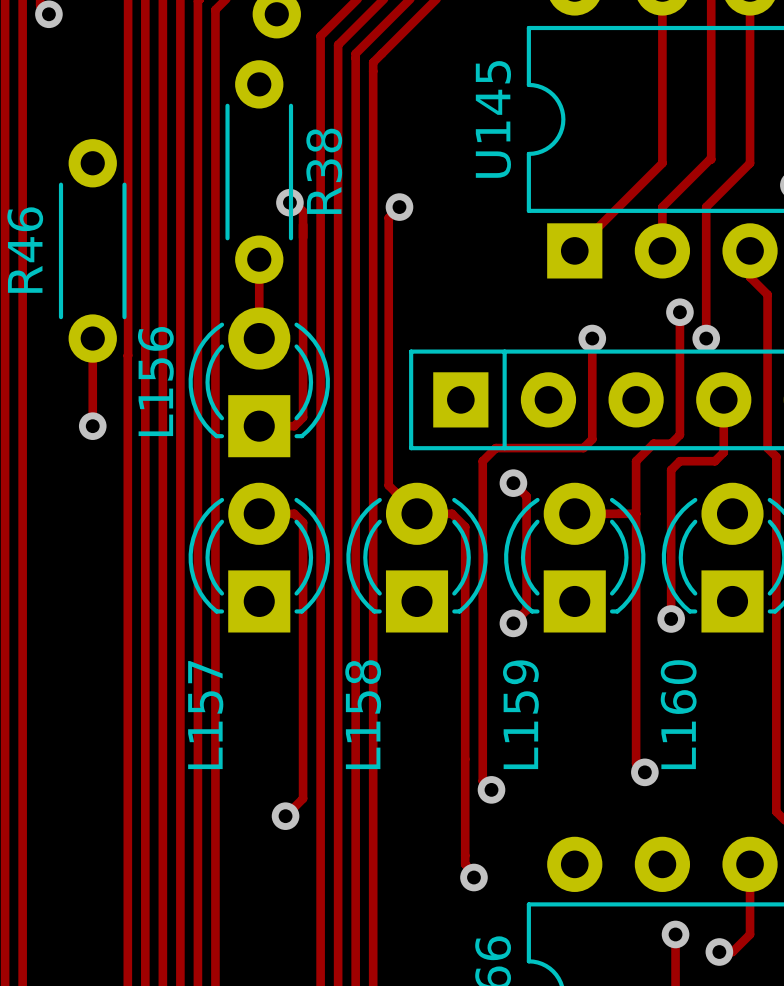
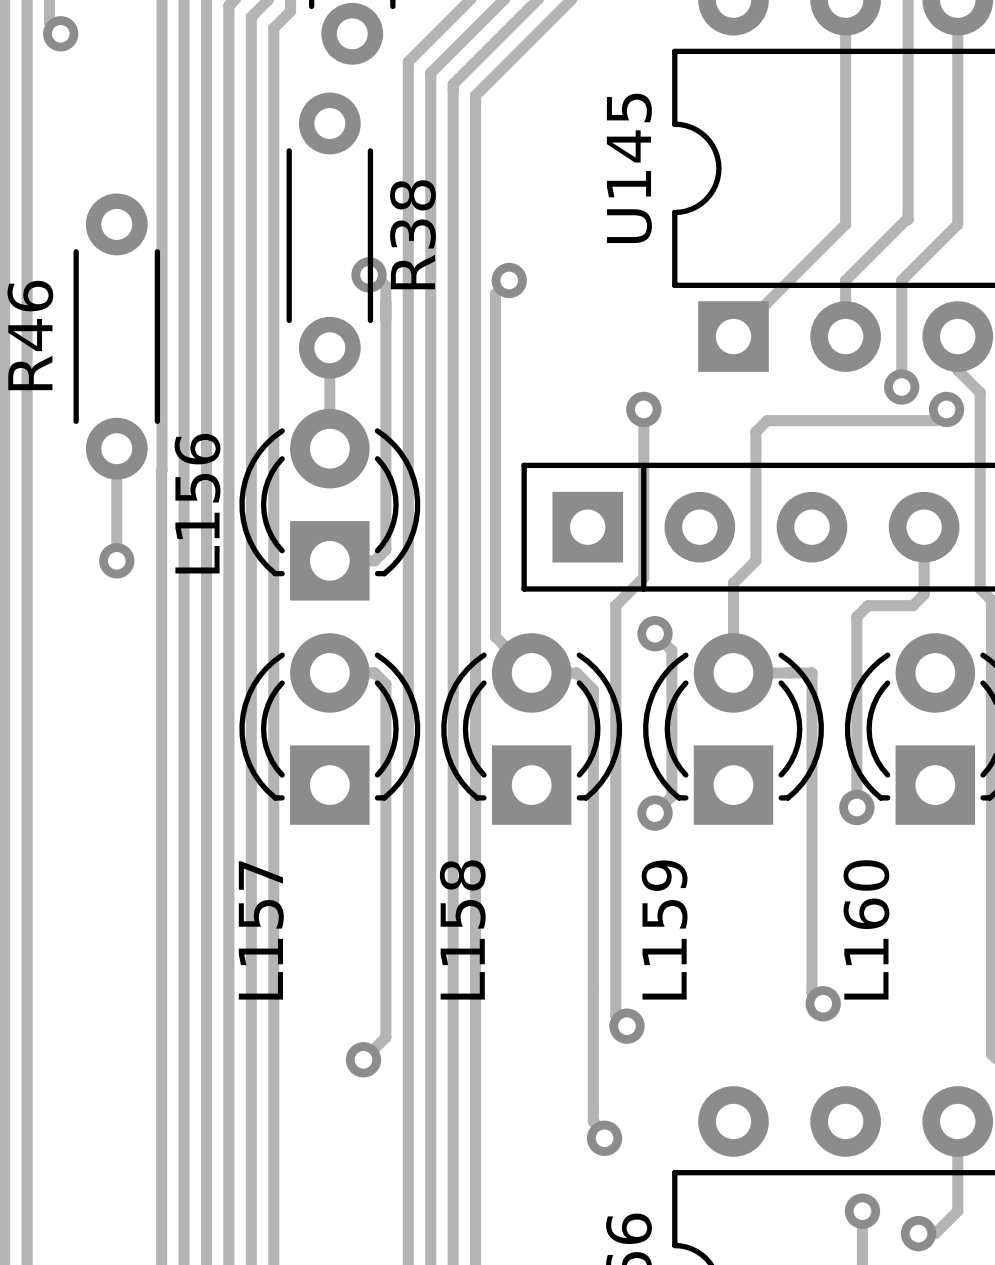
track: (706, 290) (706, 338) -> none
track: none -> (643, 409) (643, 577) (632, 588)
via: none -> (643, 409)
track: none -> (946, 409) (935, 420) (767, 420) (755, 431) (755, 448)
via: none -> (946, 409)
track: (679, 312) (679, 434) (671, 443) (653, 443) (636, 461) (636, 513) -> none
via position: (679, 312) -> (901, 387)
via: (592, 338) -> none
via: (706, 338) -> none
track: (592, 426) (592, 439) (583, 448) (495, 448) -> (755, 560) (733, 583) (733, 672)

